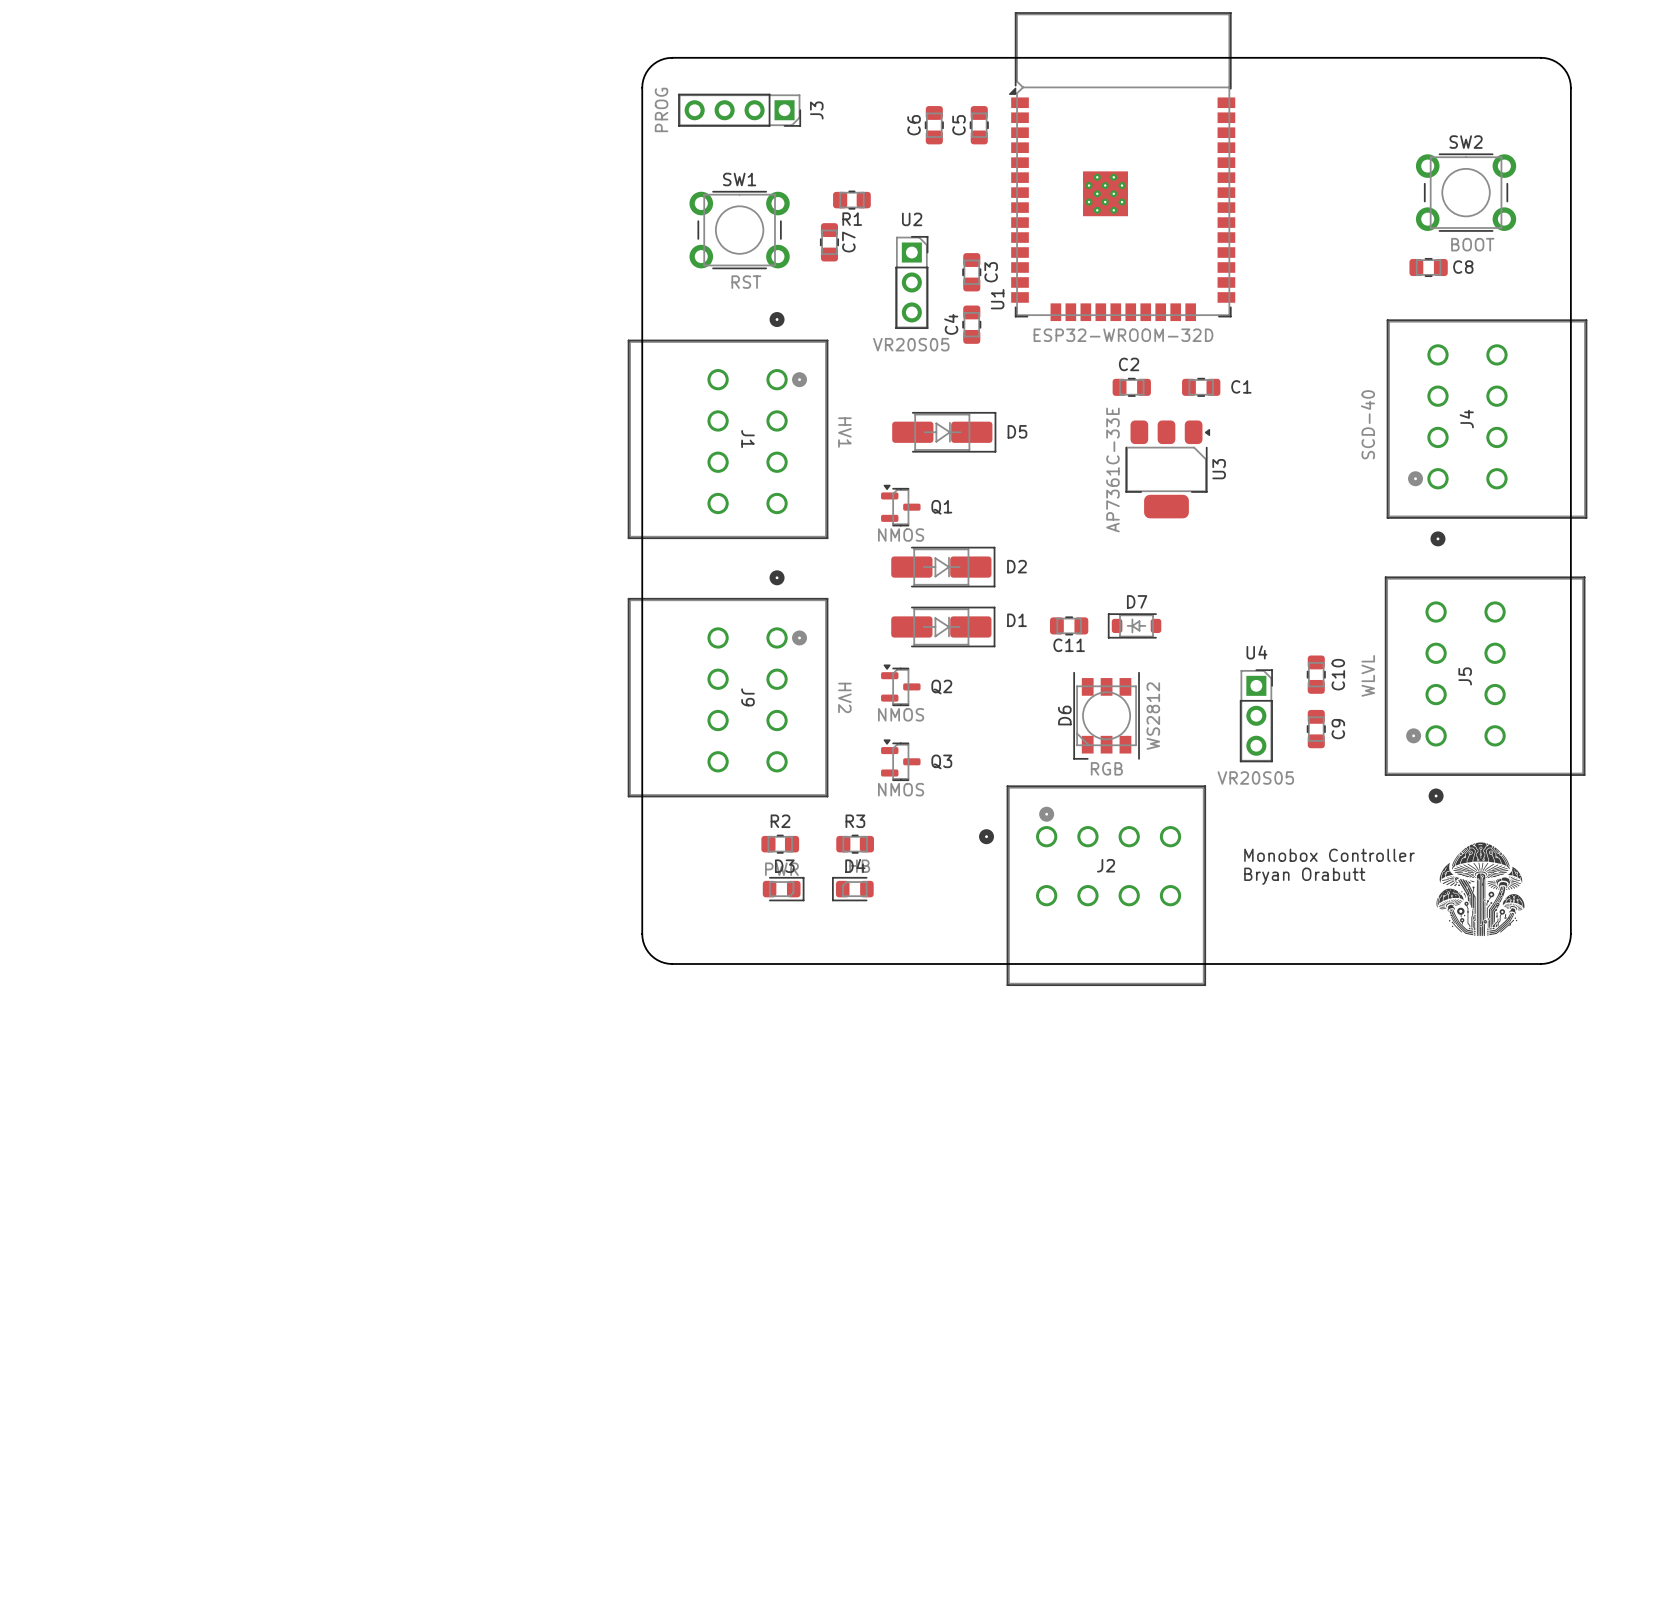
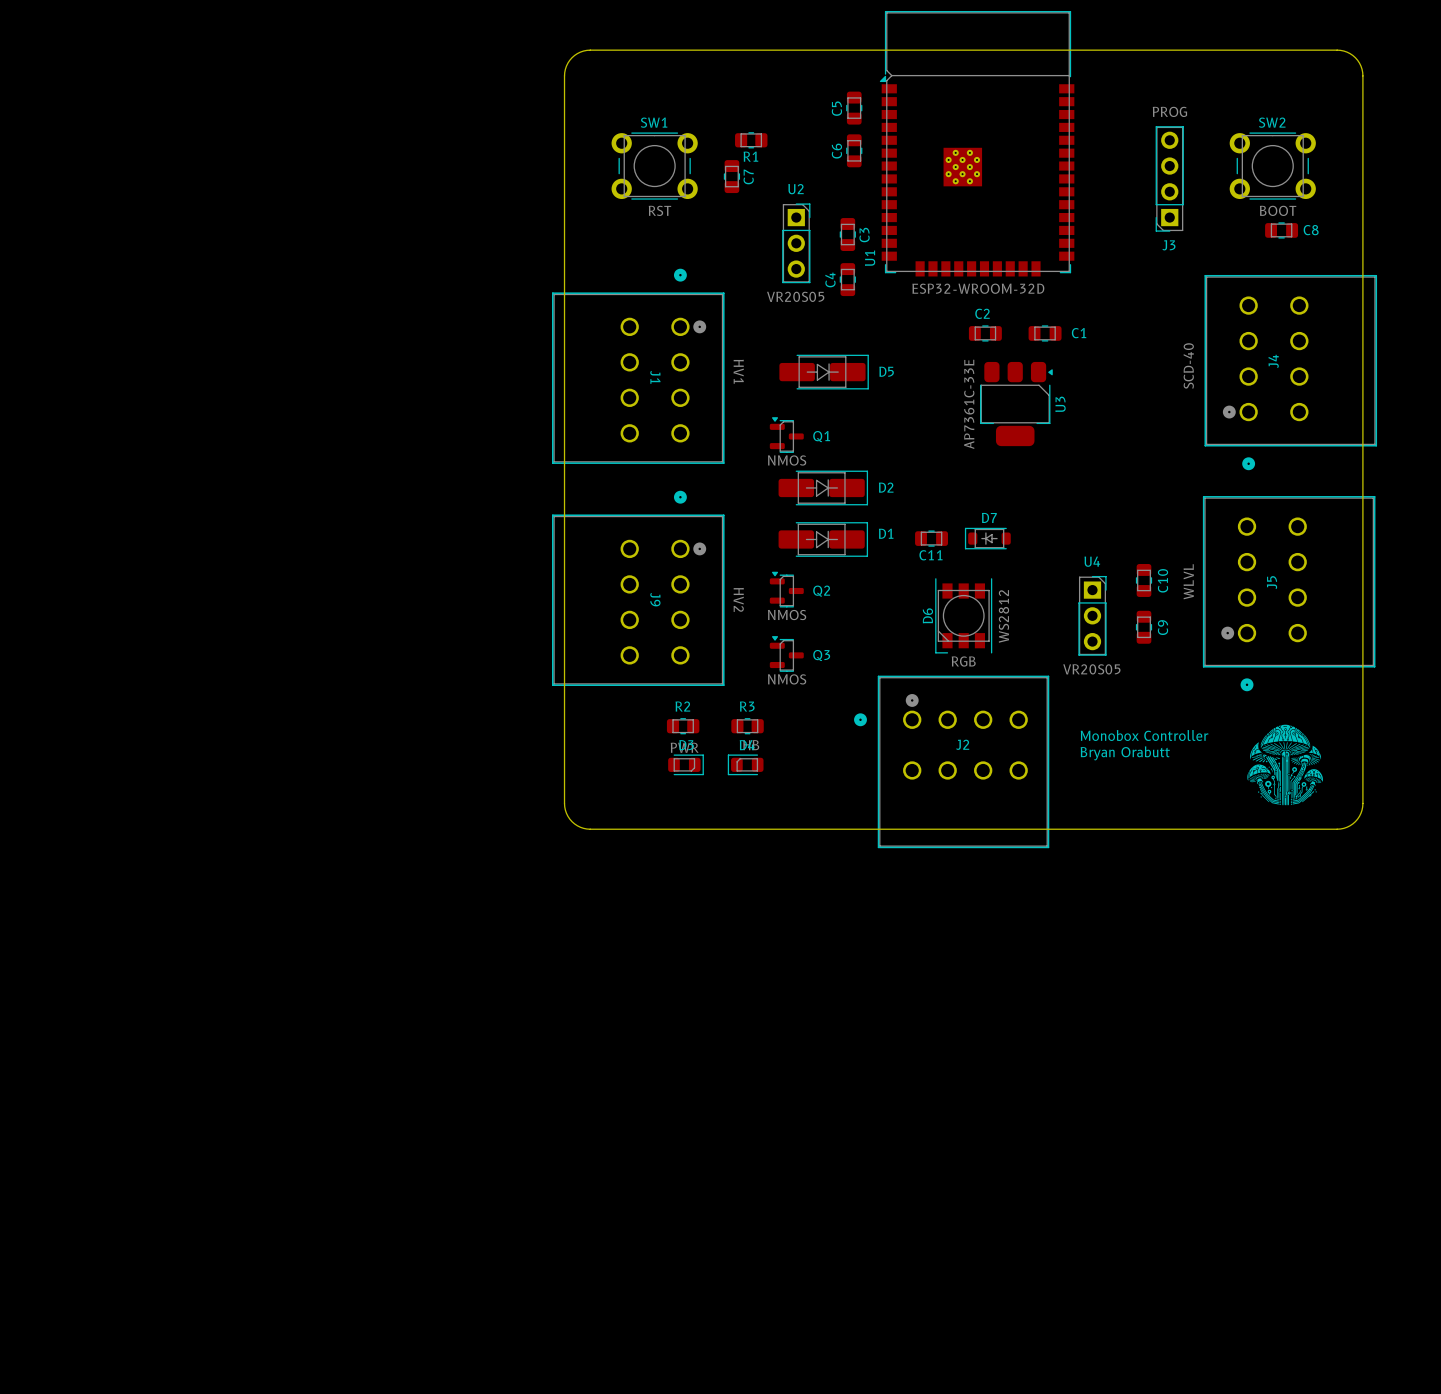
J3 rotation: 0° (739, 110) -> 90° clockwise (1169, 178)
J3 position: (739, 110) -> (1169, 178)
C6 position: (934, 125) -> (854, 150)
R1 position: (851, 200) -> (751, 140)
SW1 position: (739, 230) -> (654, 166)
C7 position: (829, 242) -> (731, 176)
C8 position: (1428, 267) -> (1281, 230)

